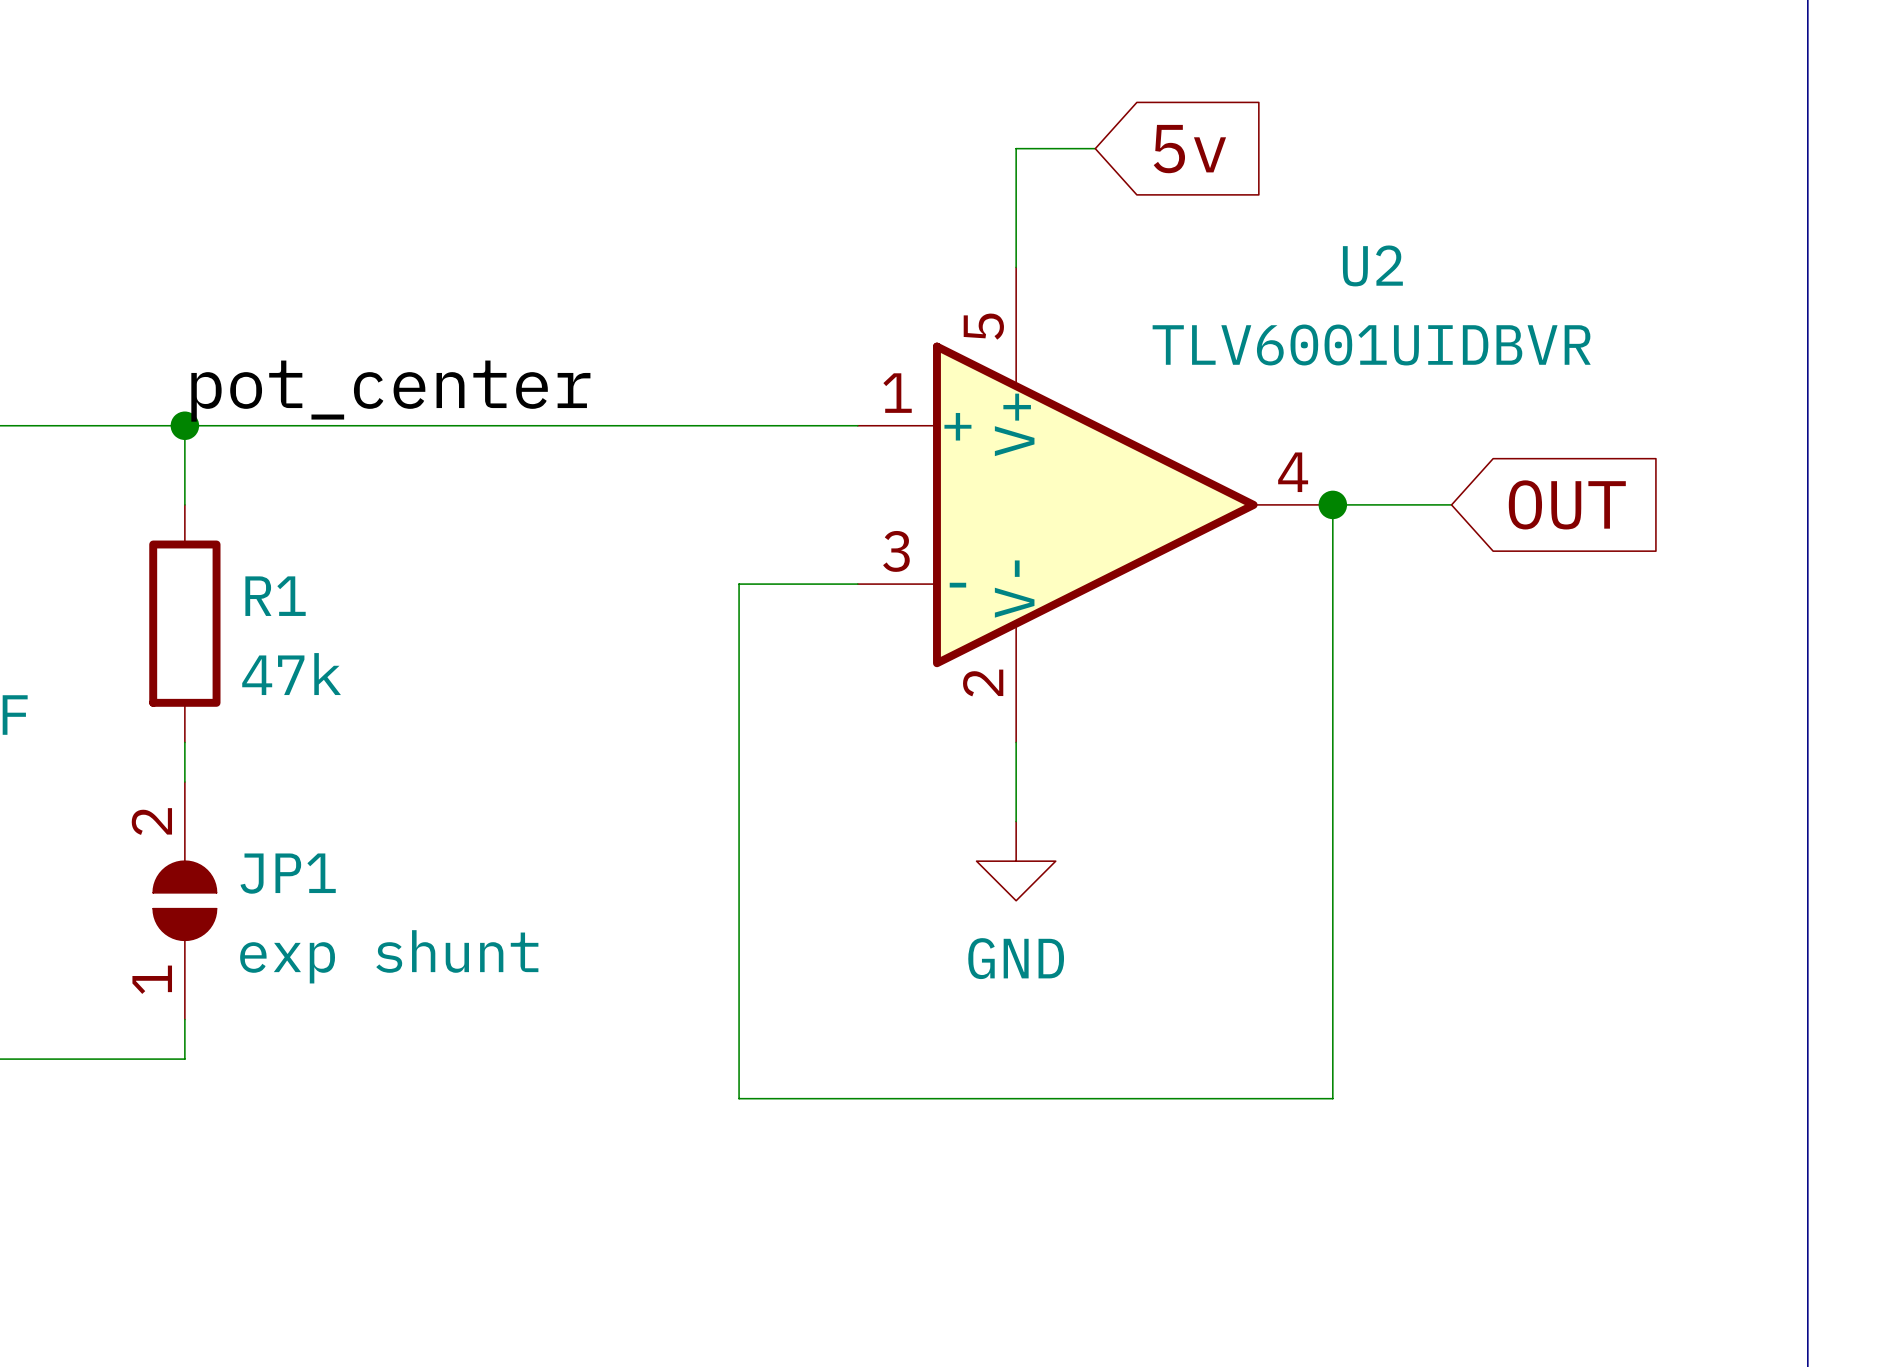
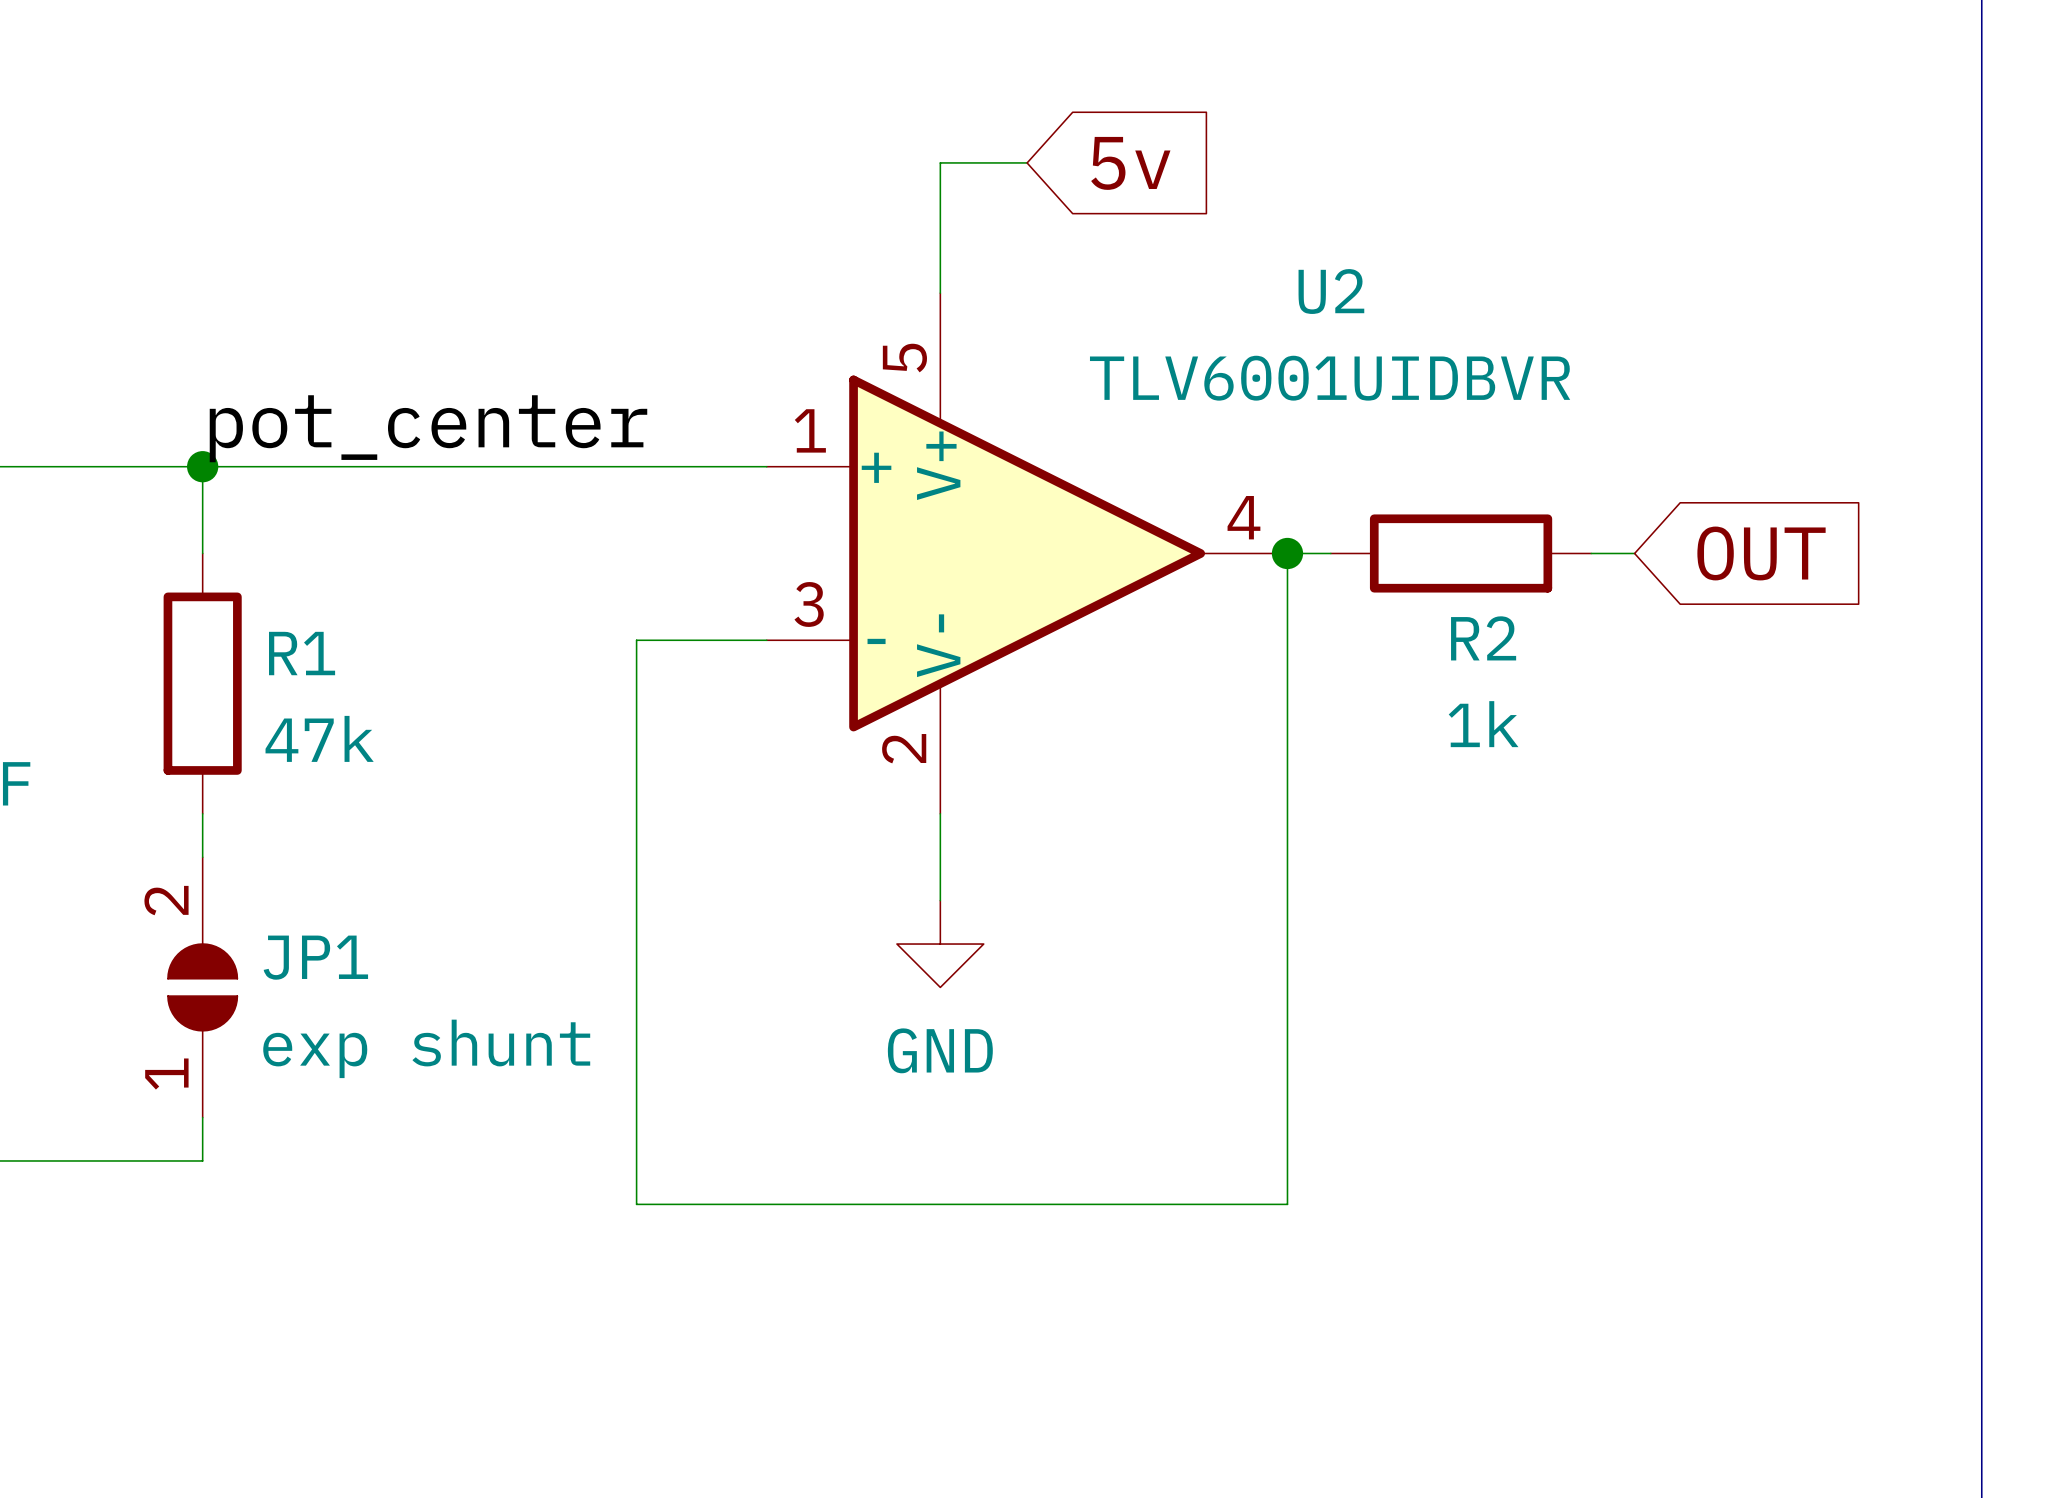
wire: (1095, 148) (1016, 148) (1016, 267) -> (1027, 162) (940, 162) (940, 293)
global label position: 5v (1189, 149) -> 5v (1130, 163)
U2 position: (1095, 504) -> (1027, 553)
junction position: (1332, 504) -> (1287, 553)
R2: none -> 1k (1461, 553)
wire: (1451, 504) (1332, 504) (1332, 1098) (1174, 1098) -> (1330, 553) (1287, 553) (1287, 1204)
wire: none -> (1591, 553) (1634, 553)
global label position: OUT (1567, 504) -> OUT (1761, 553)
wire: (857, 584) (739, 584) (739, 1098) -> (766, 640) (636, 640) (636, 1204) (810, 1204)
wire: (1016, 742) (1016, 821) -> (940, 813) (940, 900)
power symbol position: GND (1016, 861) -> GND (940, 944)

